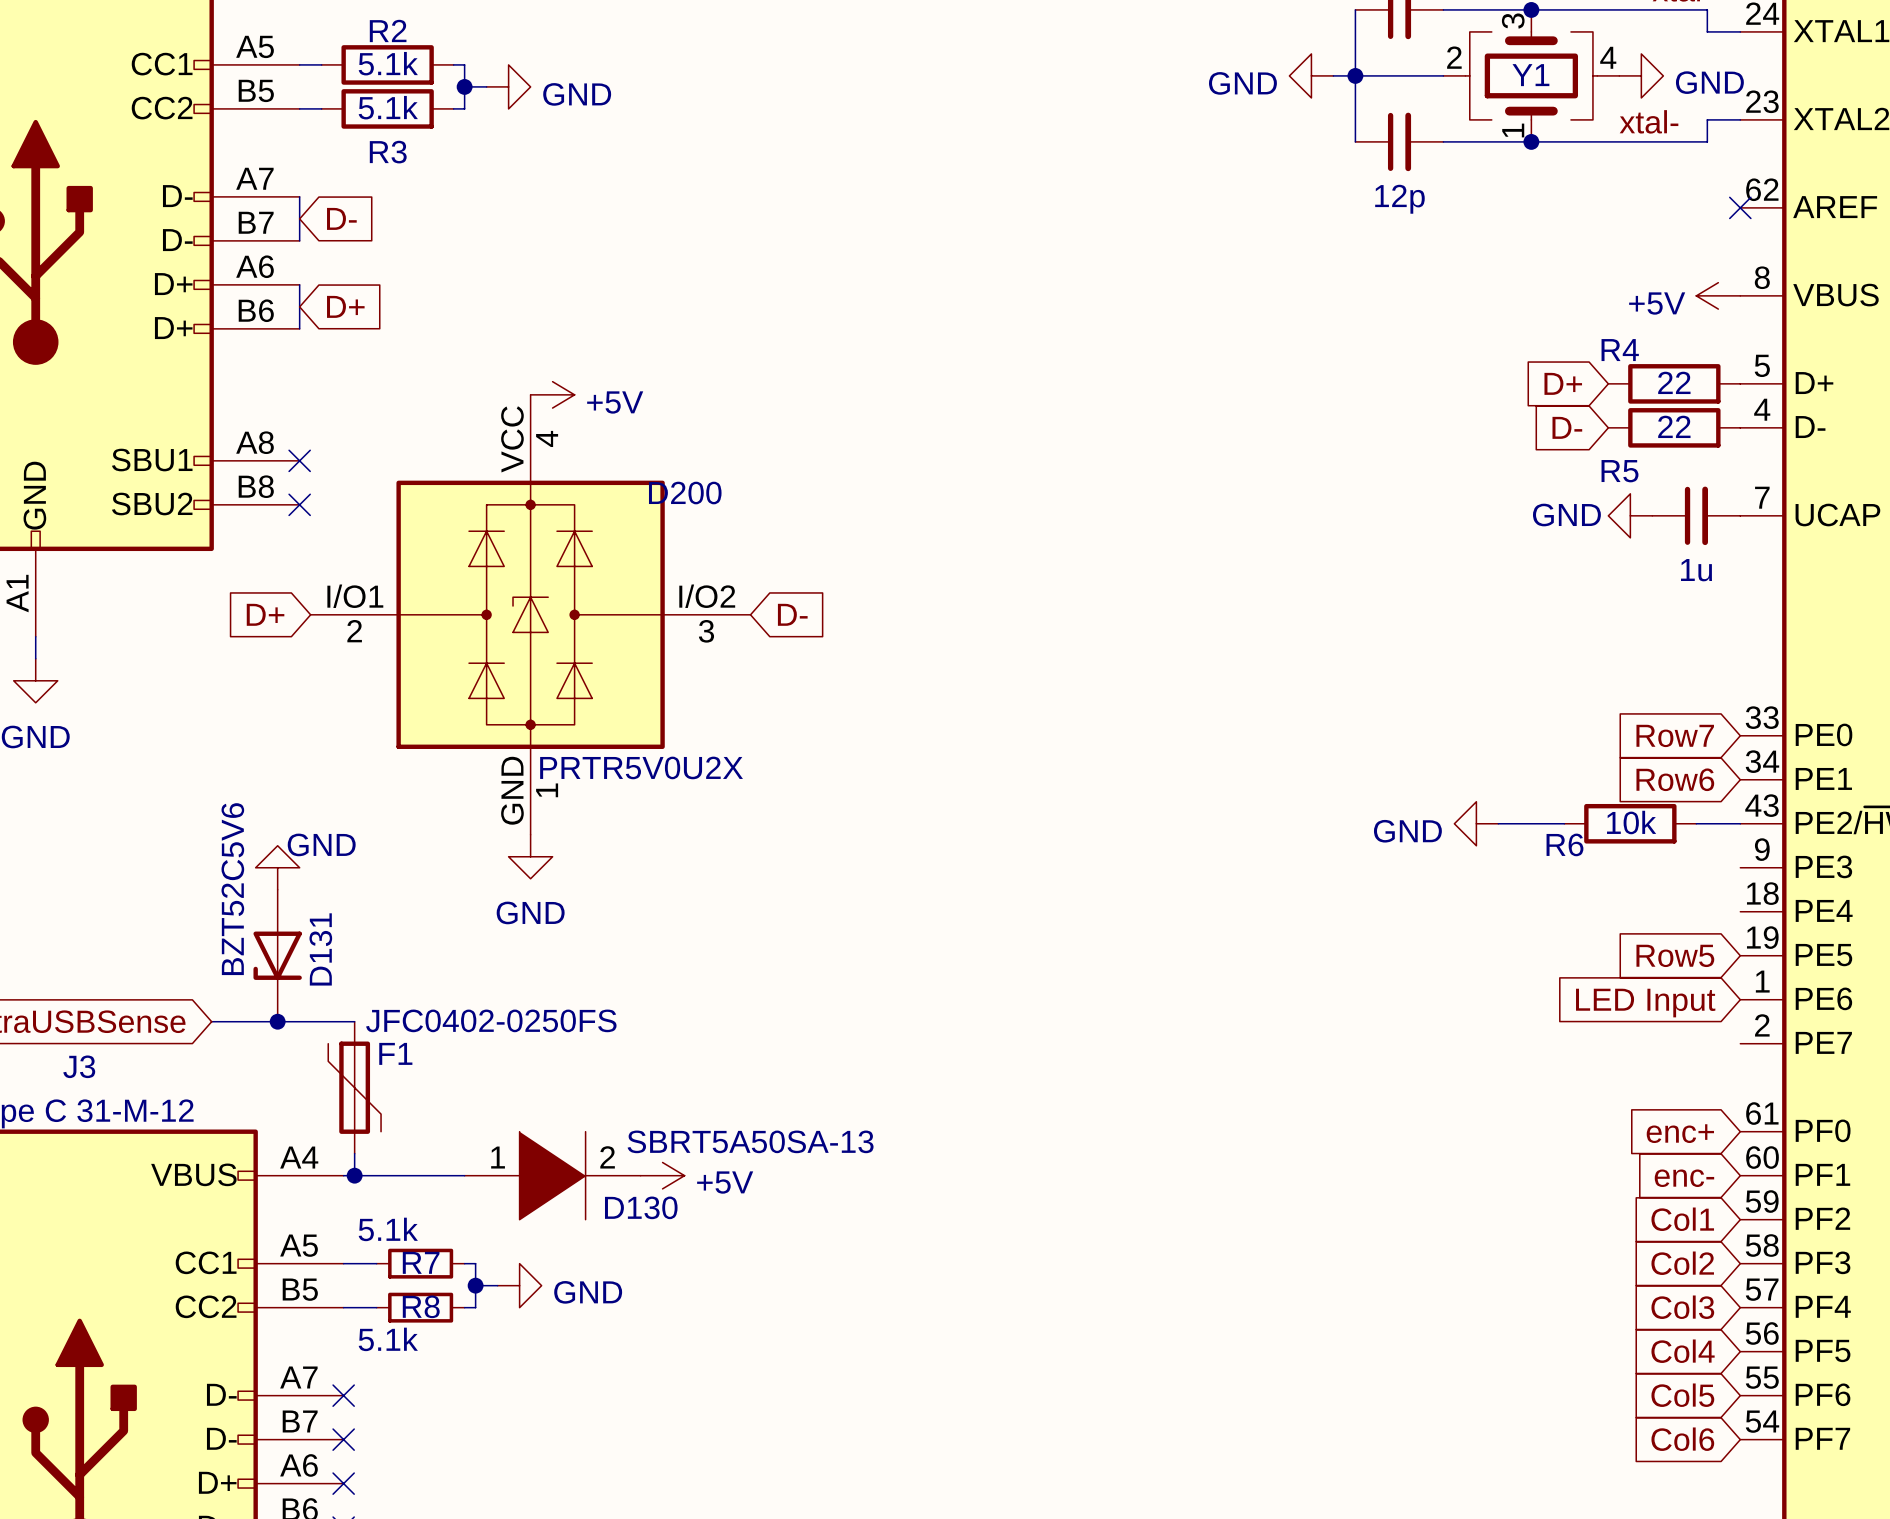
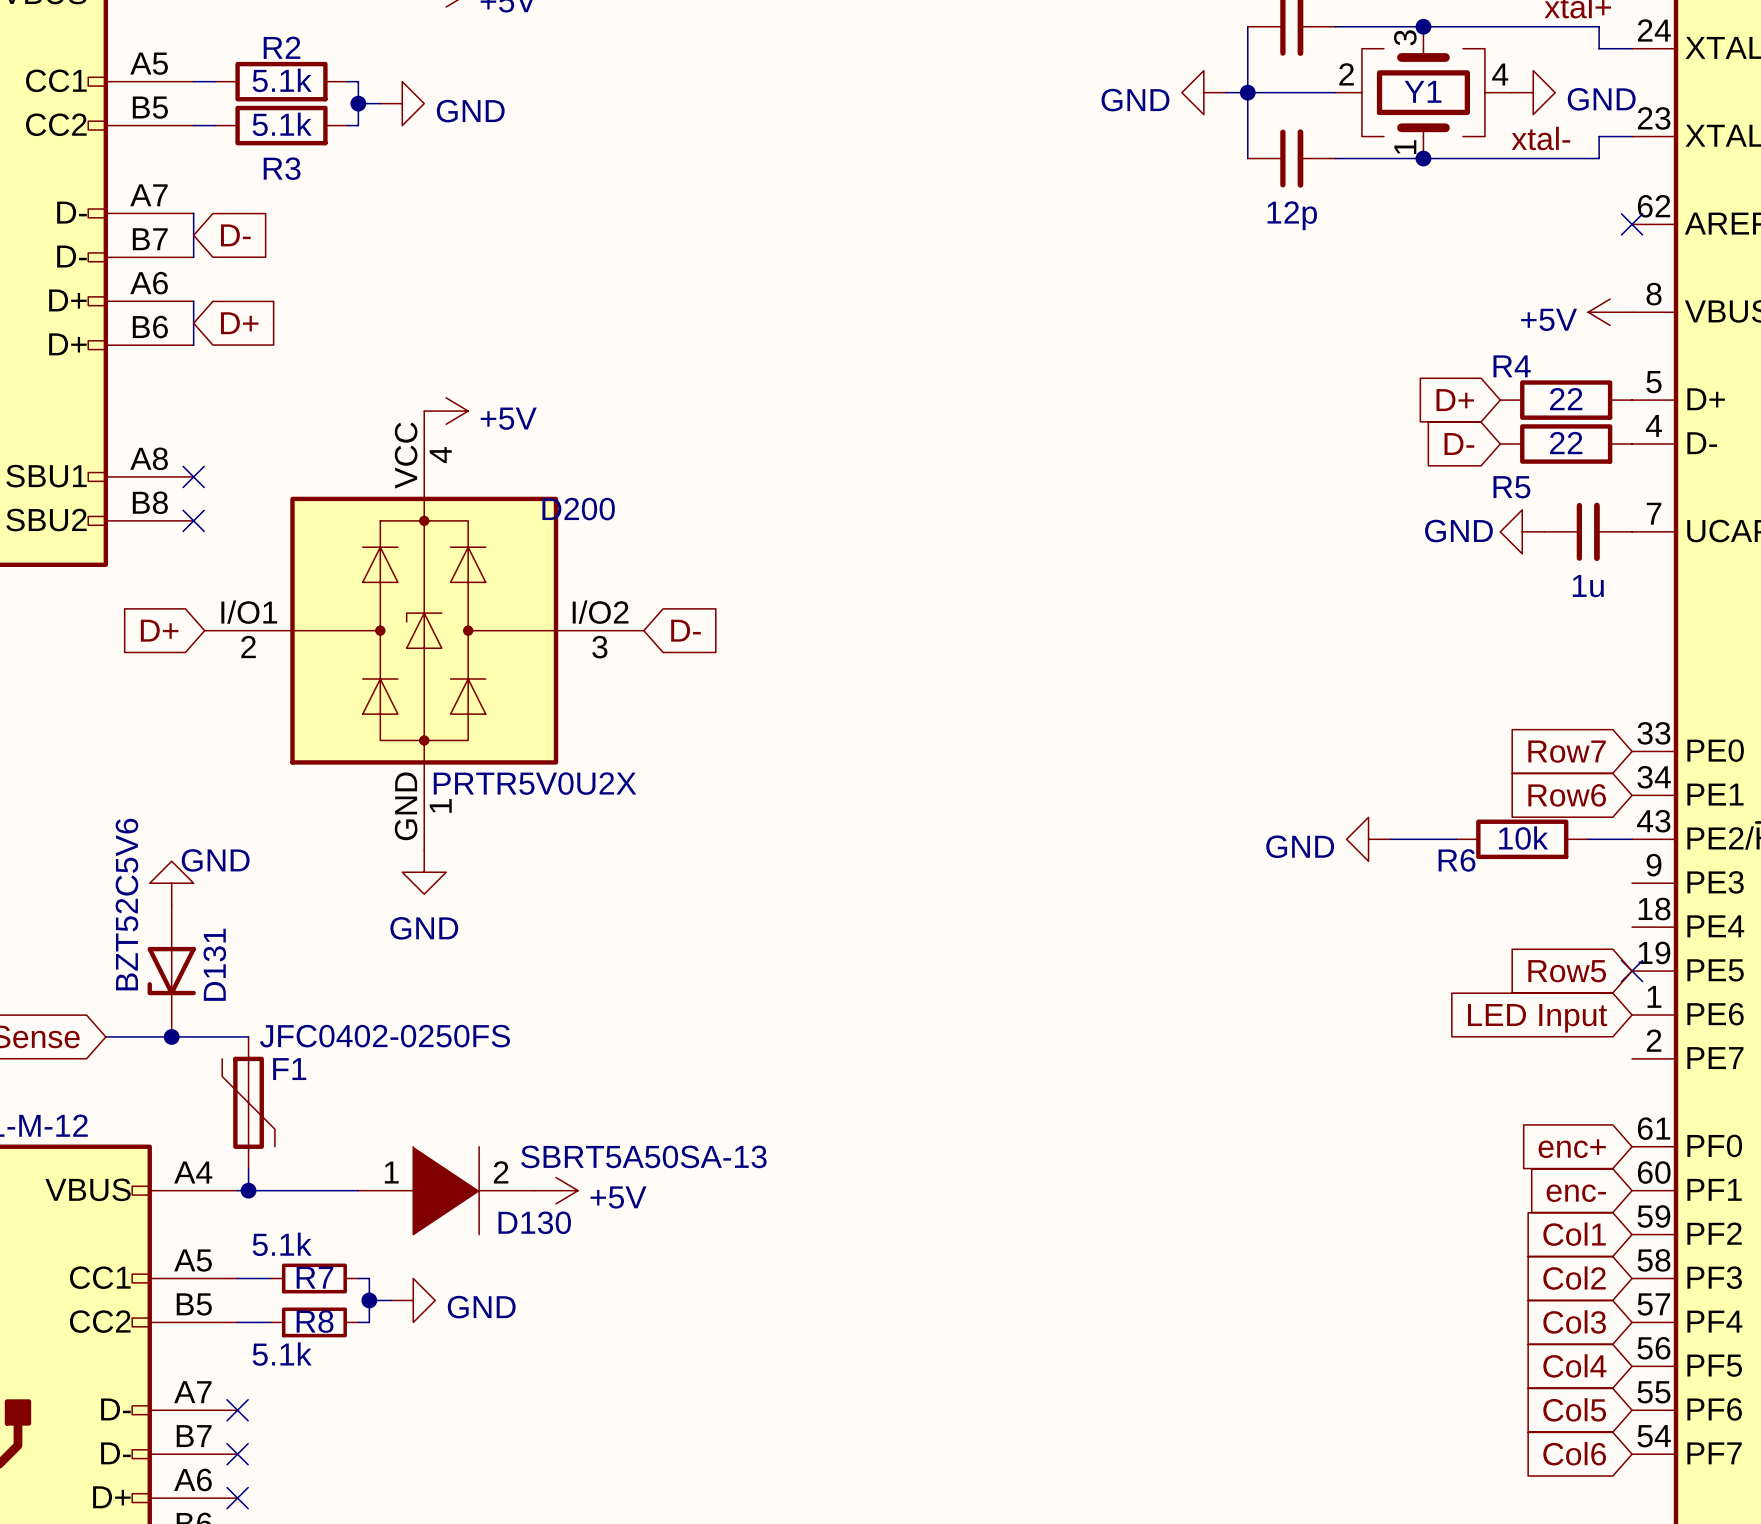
no-connect mark: none -> (1632, 971)

